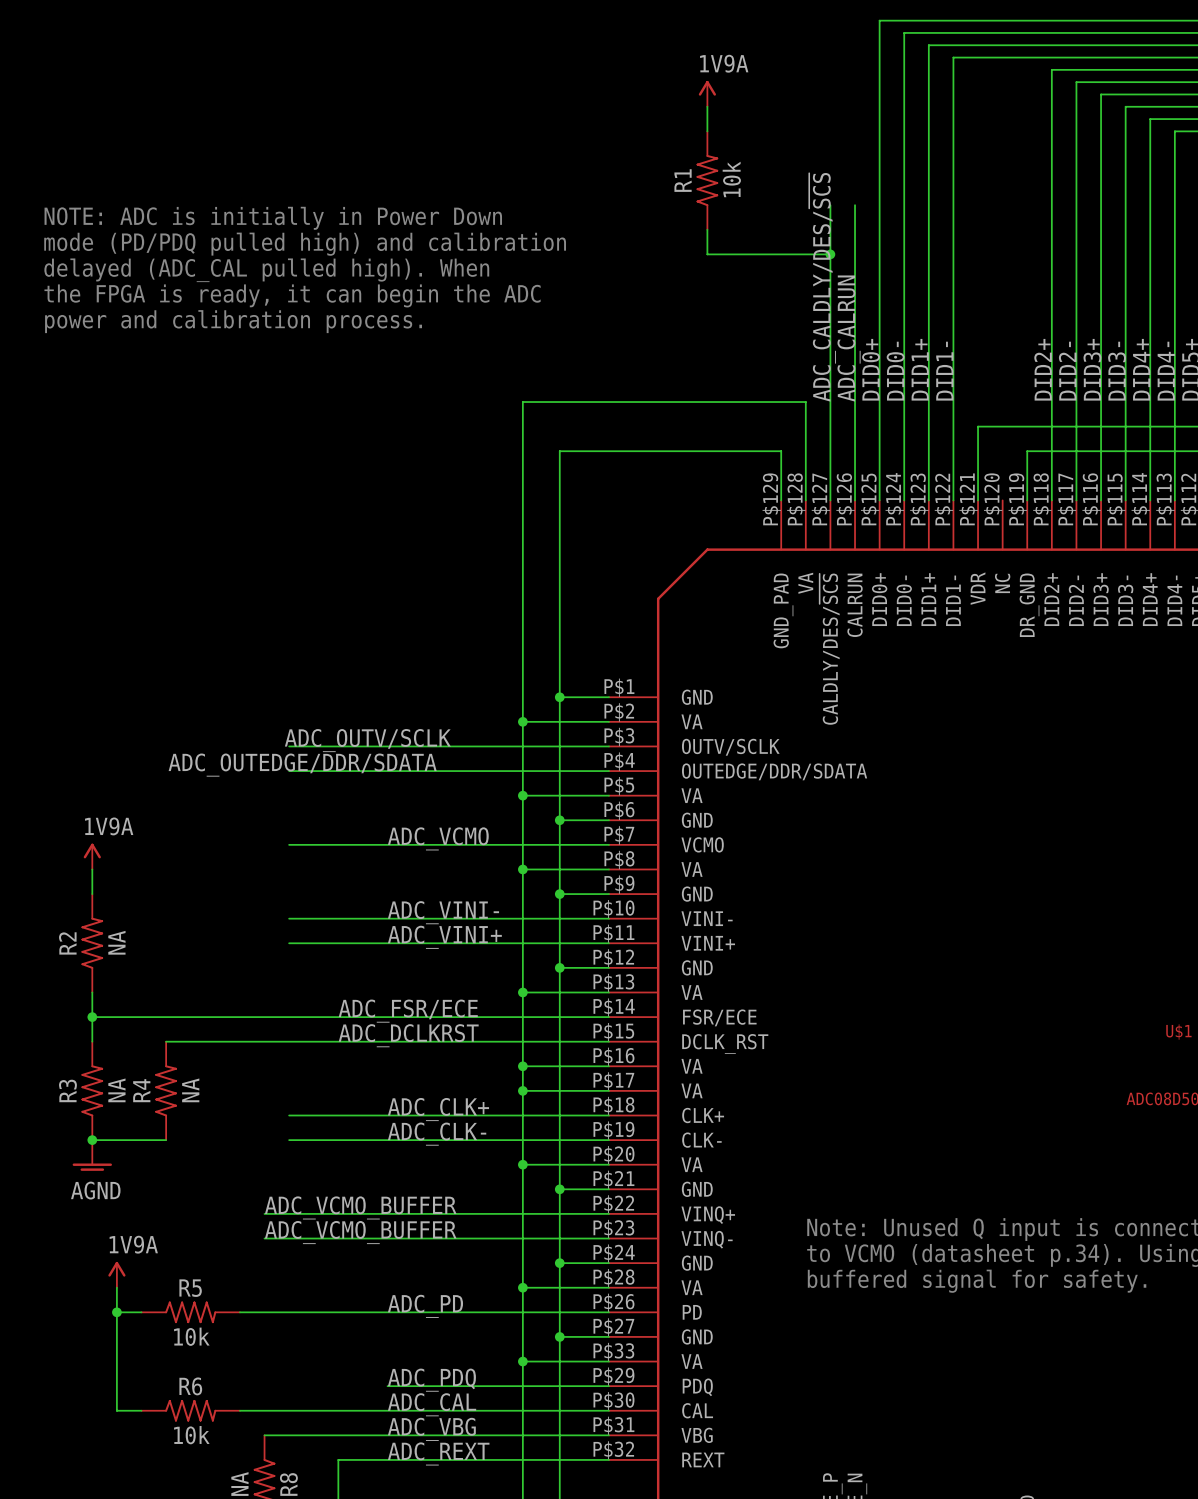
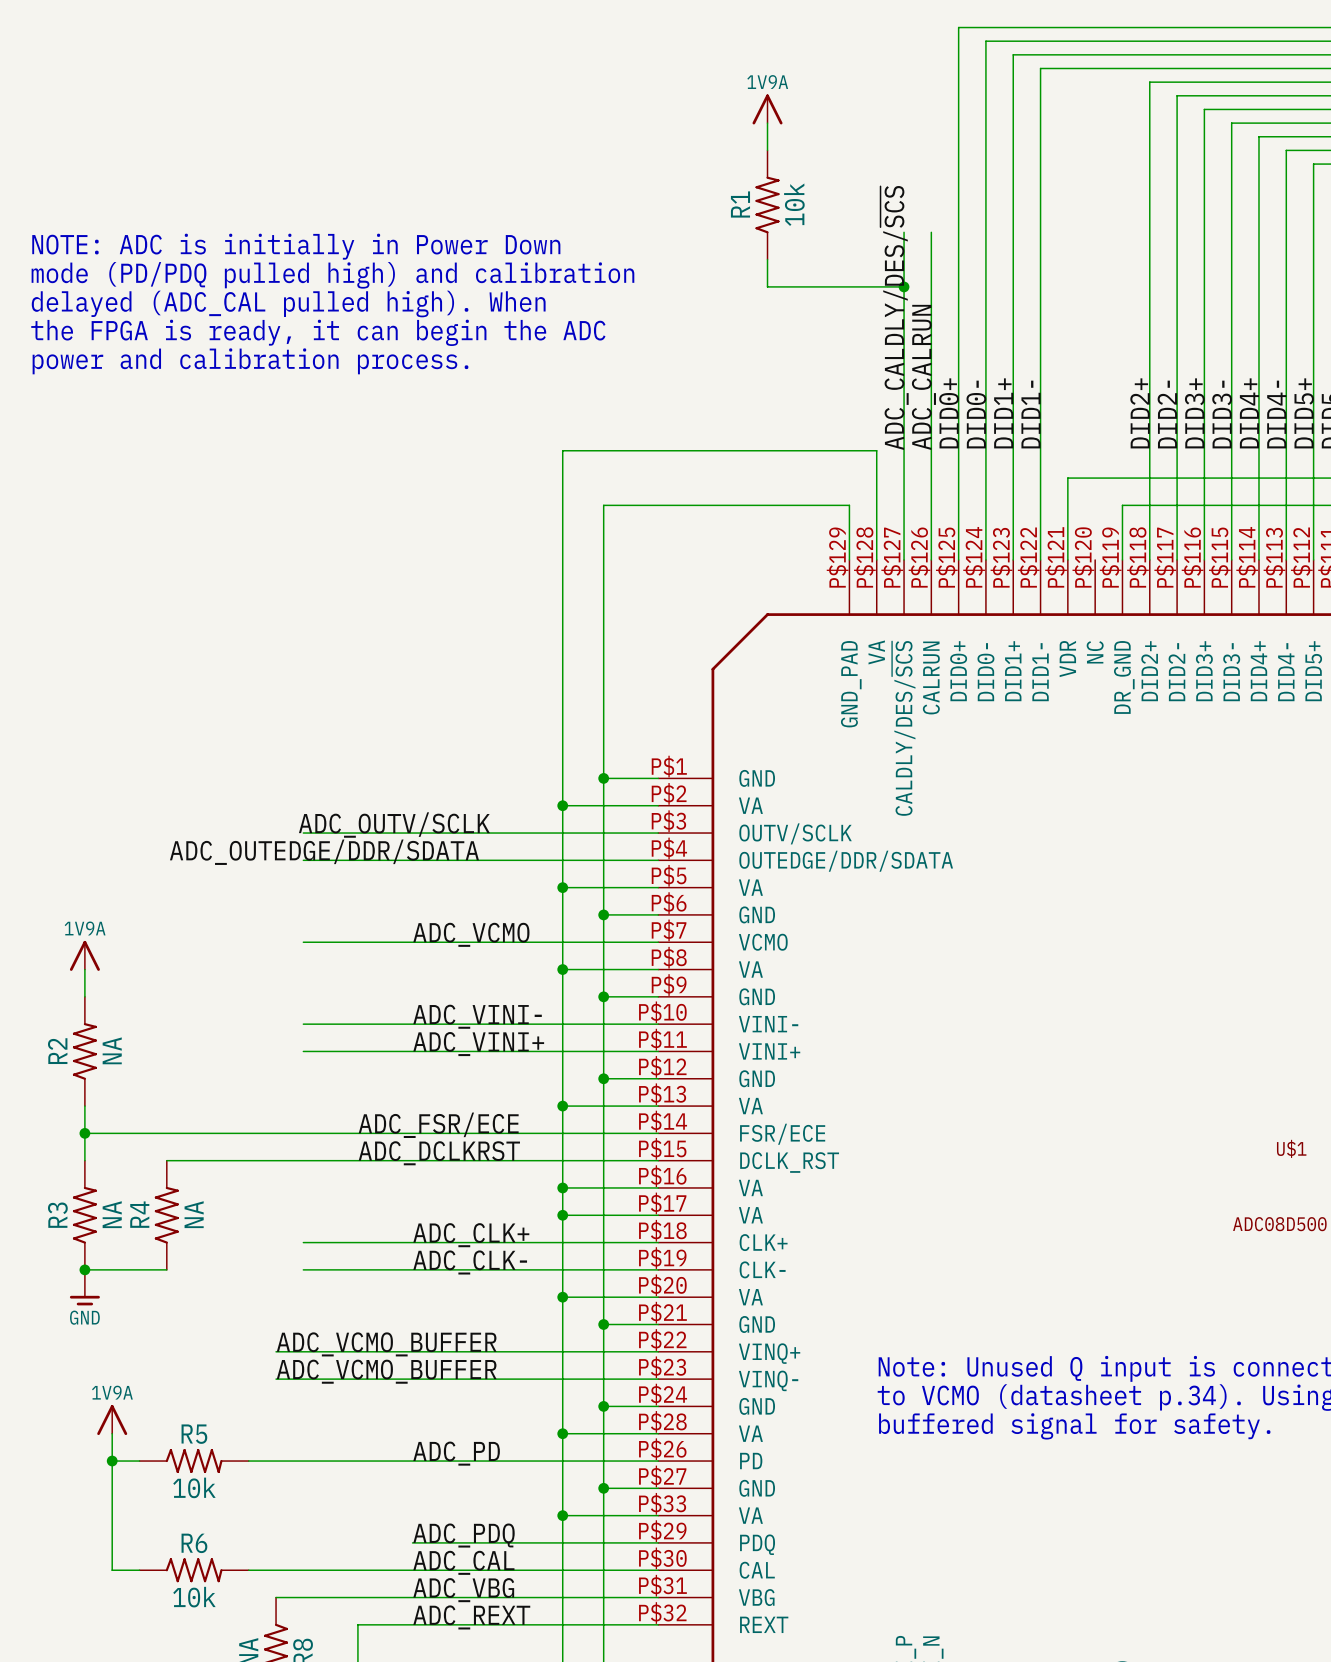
power symbol text: 1V9A (724, 63) -> none
power symbol shape: [698, 80, 717, 107] -> [752, 94, 783, 125]
power symbol text: 1V9A (109, 826) -> none
power symbol shape: [83, 843, 101, 870] -> [69, 940, 100, 971]
power symbol shape: [72, 1140, 112, 1171] -> [69, 1269, 100, 1306]
power symbol text: AGND (95, 1190) -> none
power symbol text: 1V9A (133, 1244) -> none
power symbol shape: [108, 1261, 126, 1288] -> [97, 1405, 128, 1436]

